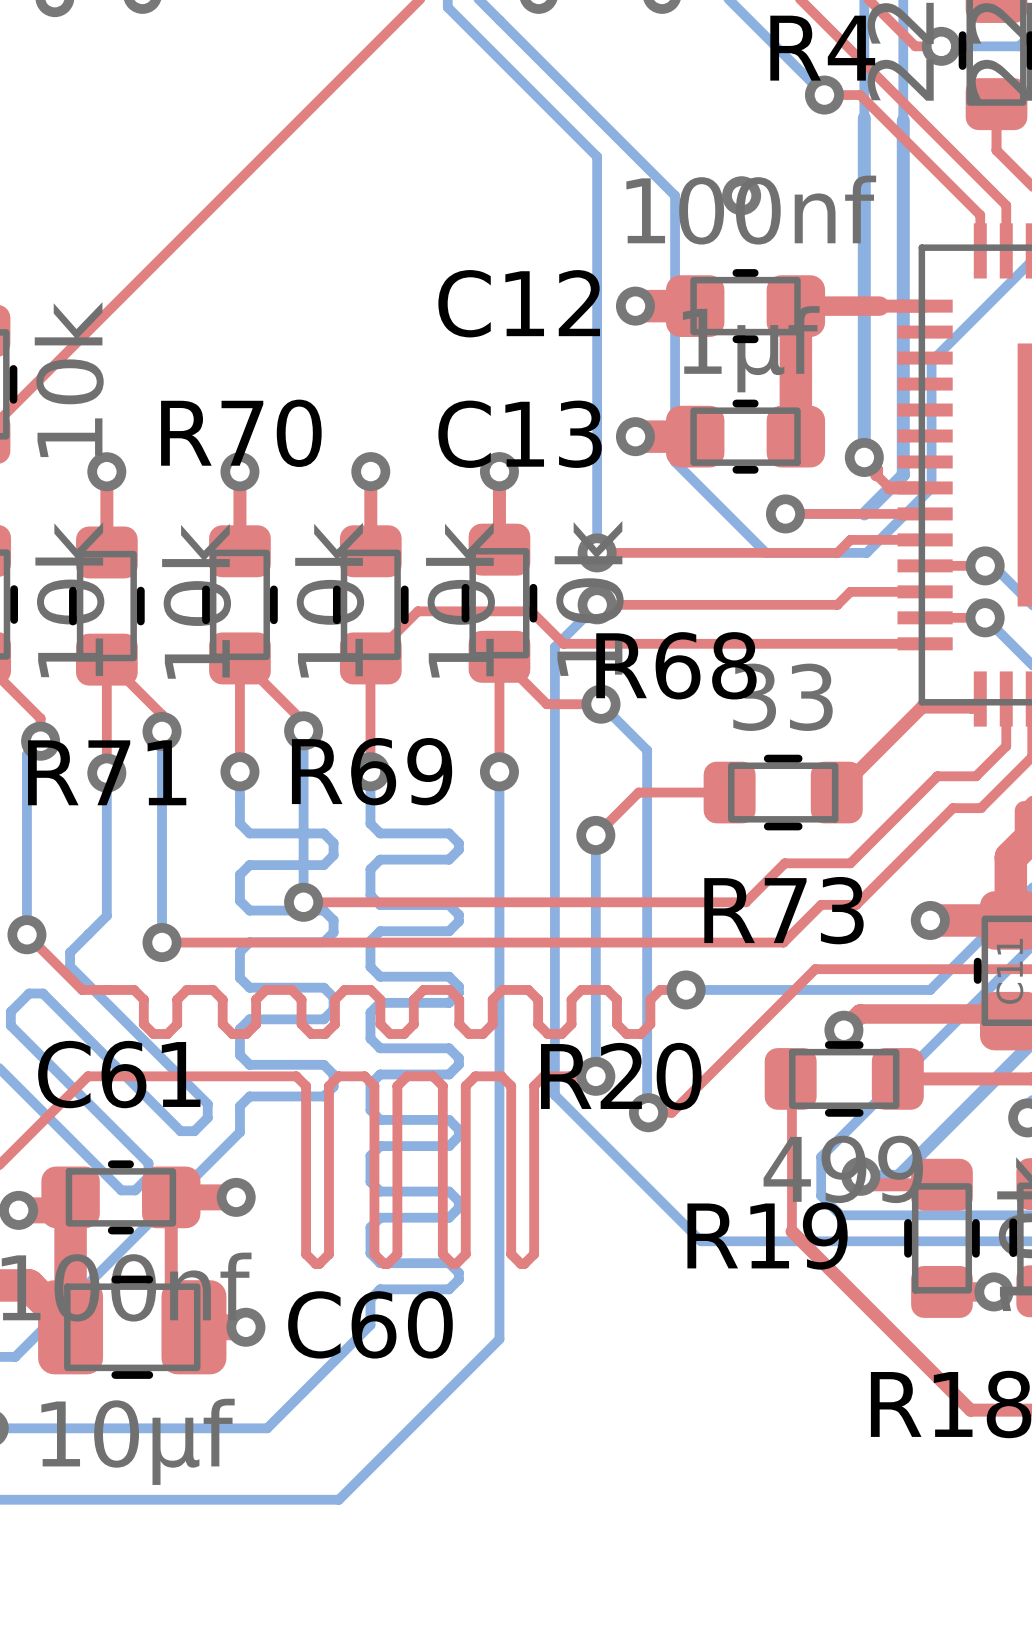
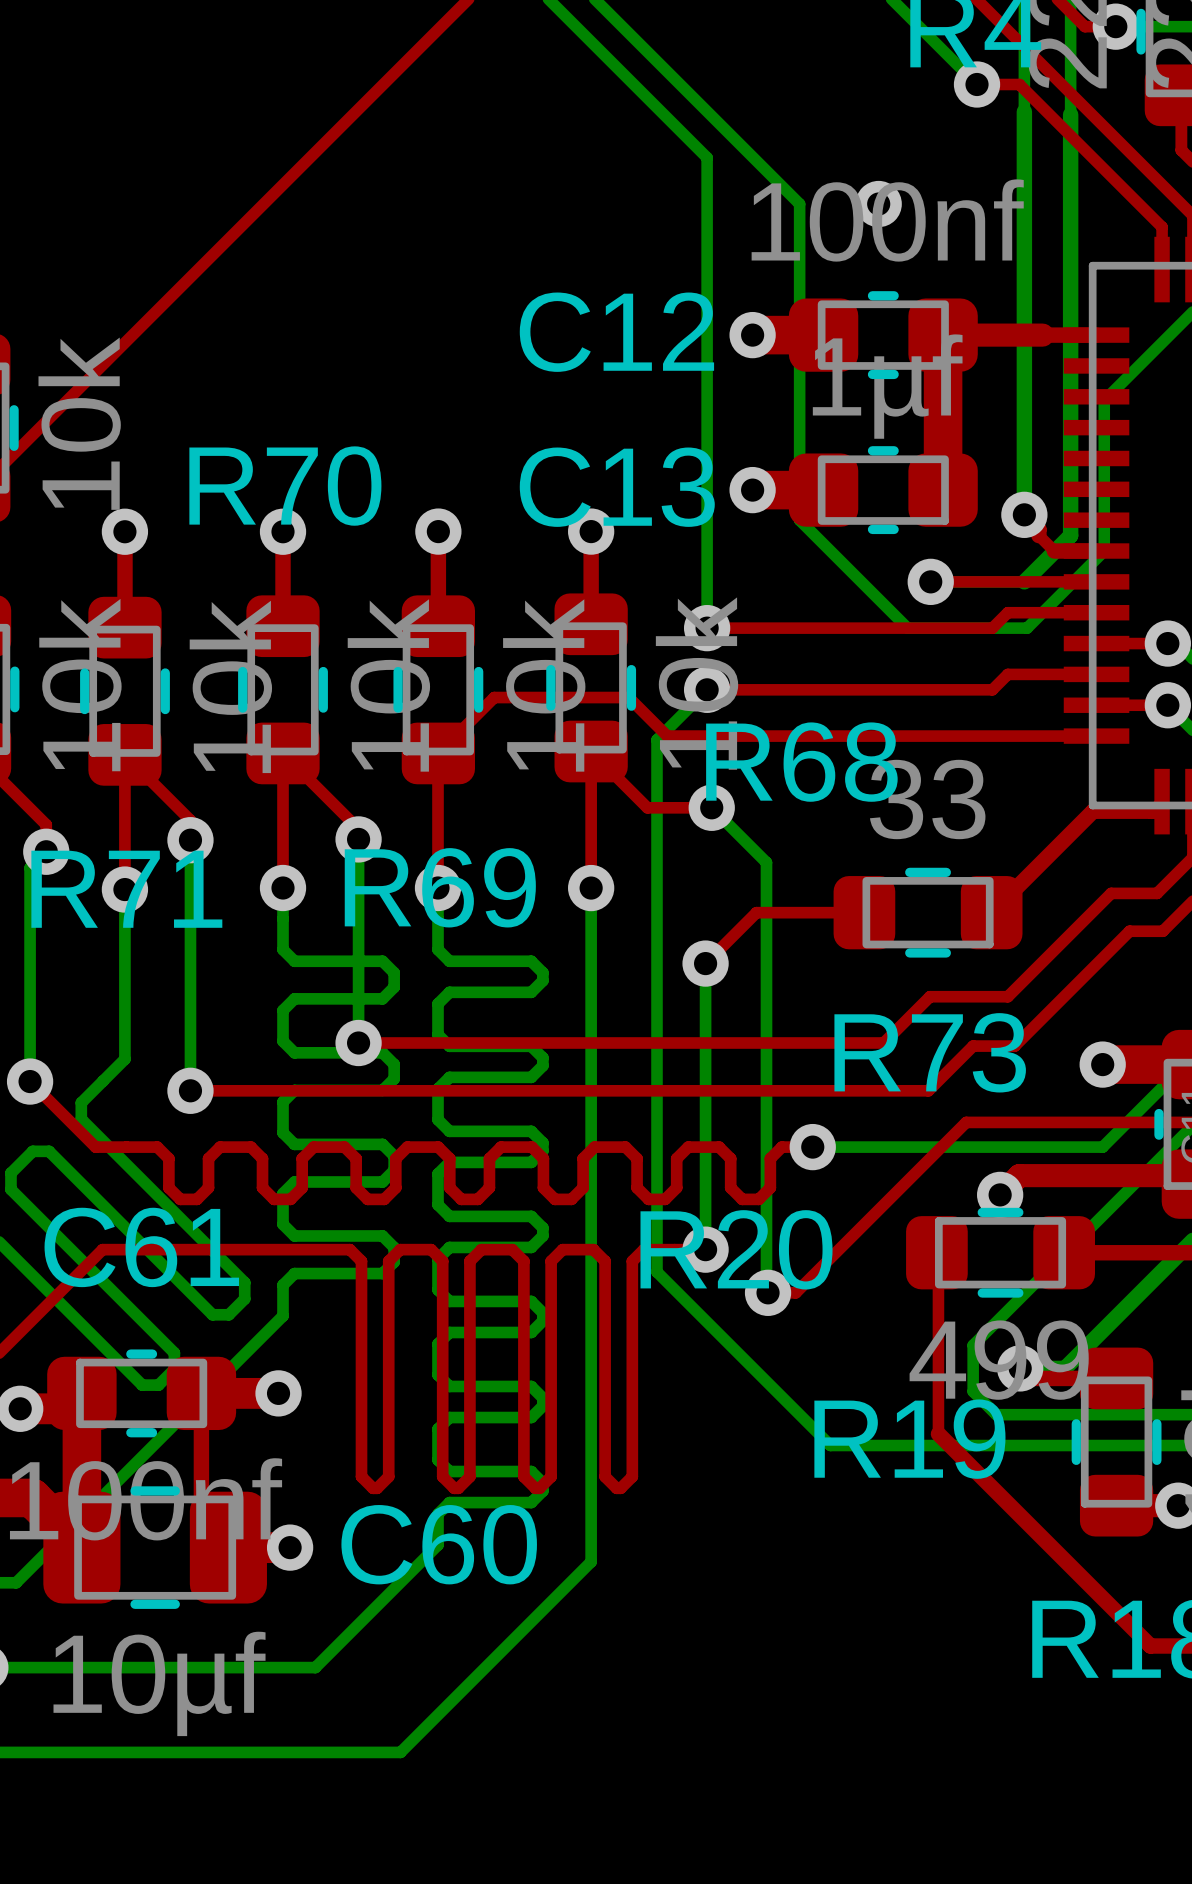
top track: (306, 1254) (315, 1263) (319, 1263) (328, 1254) -> (361, 1460) (361, 1476) (373, 1488) (377, 1488) (388, 1476) (388, 1460)
top track: (374, 1254) (384, 1263) (387, 1263) (397, 1254) -> (442, 1460) (442, 1476) (454, 1488) (458, 1488) (469, 1476) (469, 1460)
top track: (442, 1254) (452, 1263) (456, 1263) (465, 1254) -> (523, 1460) (523, 1476) (535, 1488) (539, 1488) (551, 1476) (551, 1460)
top track: (511, 1254) (520, 1263) (524, 1263) (534, 1254) -> (605, 1460) (605, 1476) (616, 1488) (620, 1488) (632, 1476) (632, 1460)

